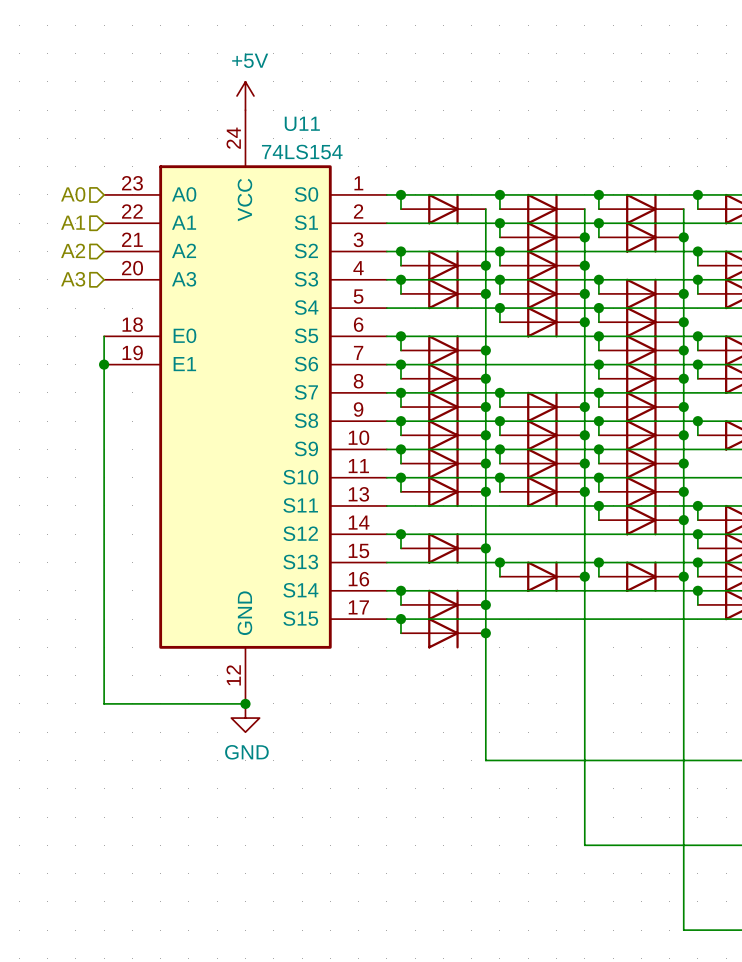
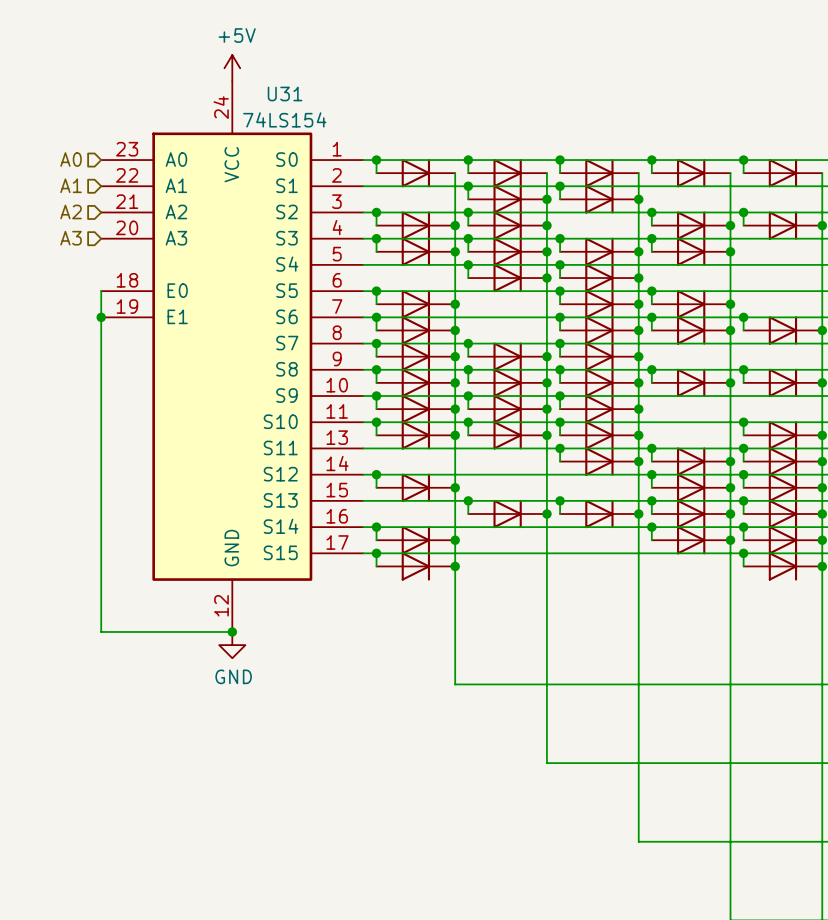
U11 name: U11 (302, 123) -> U31 (285, 93)

